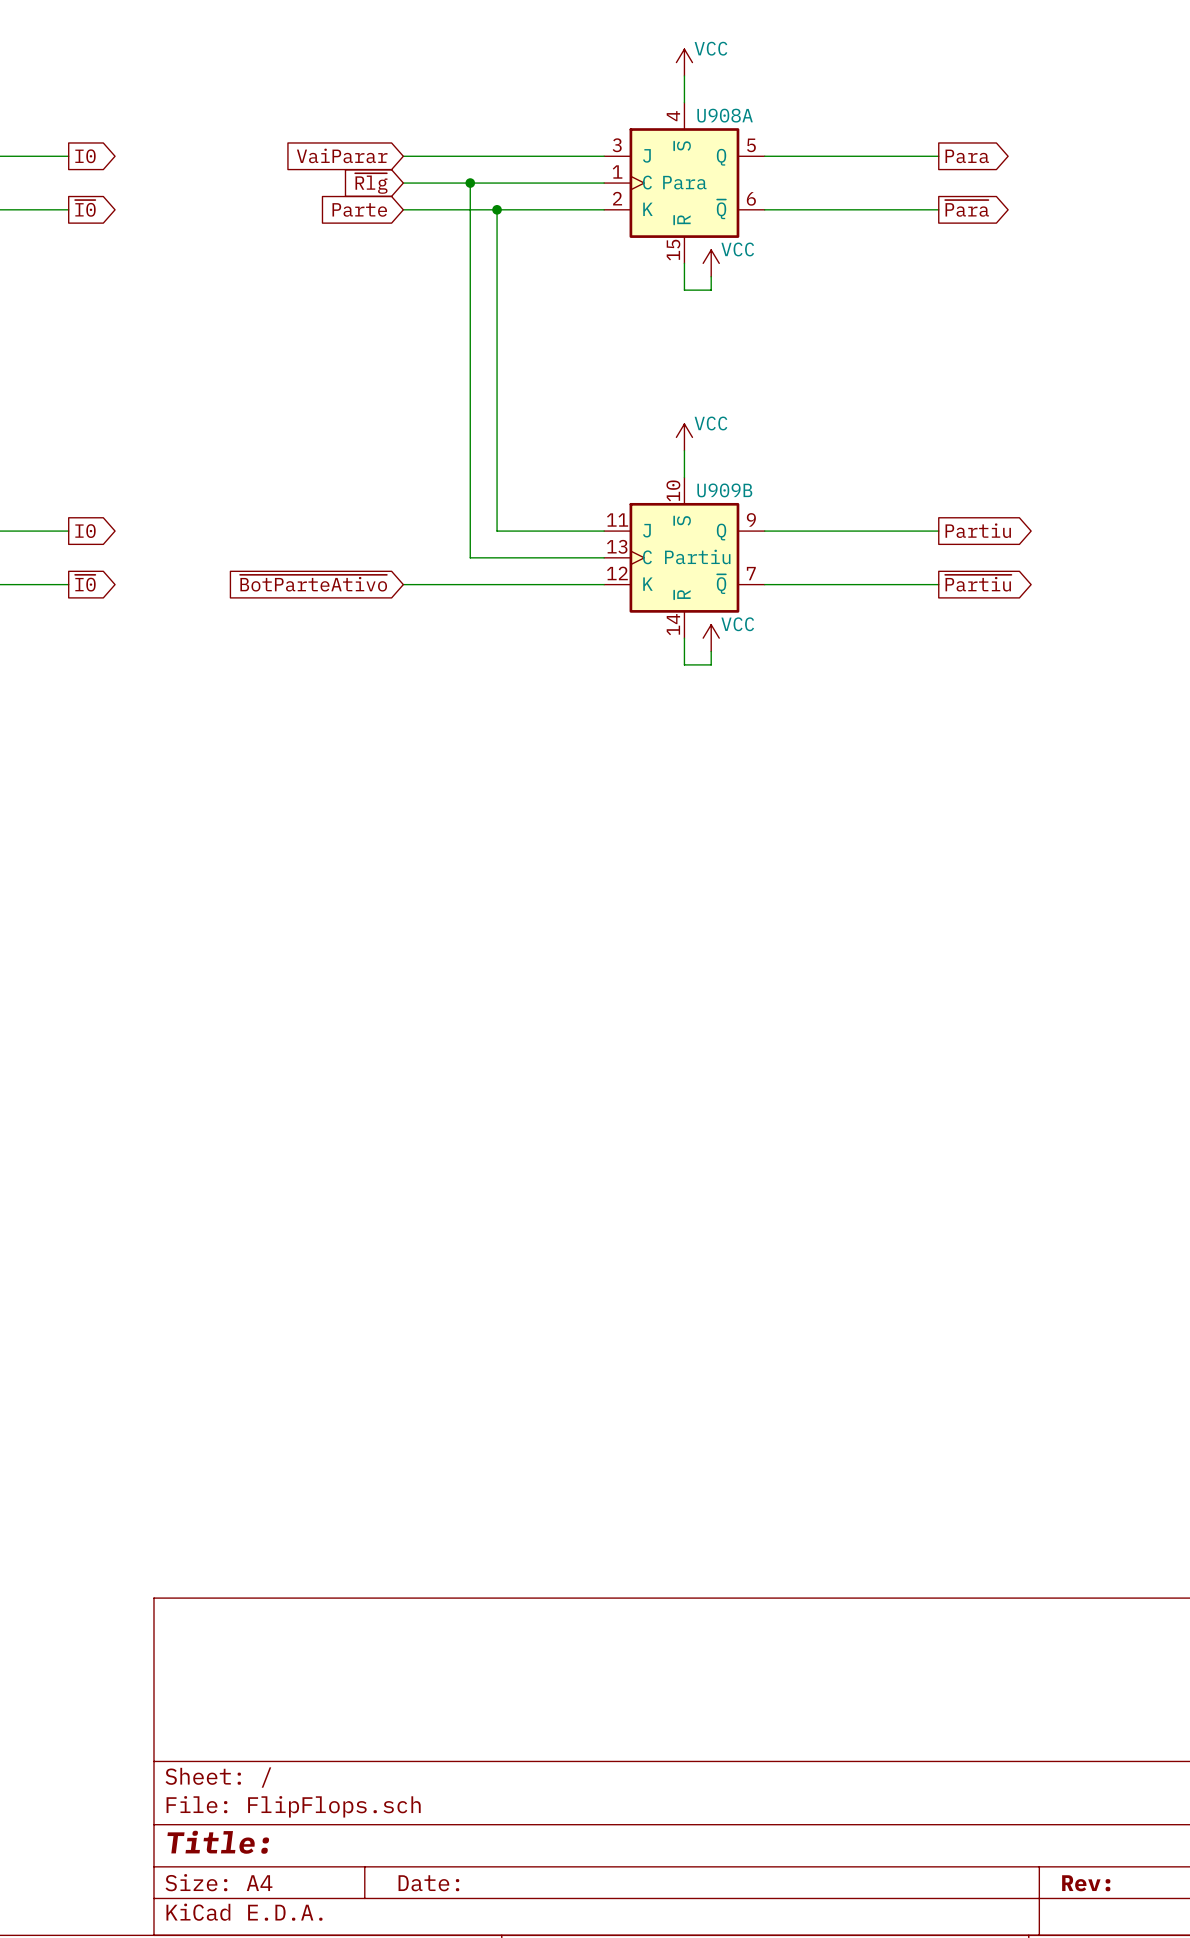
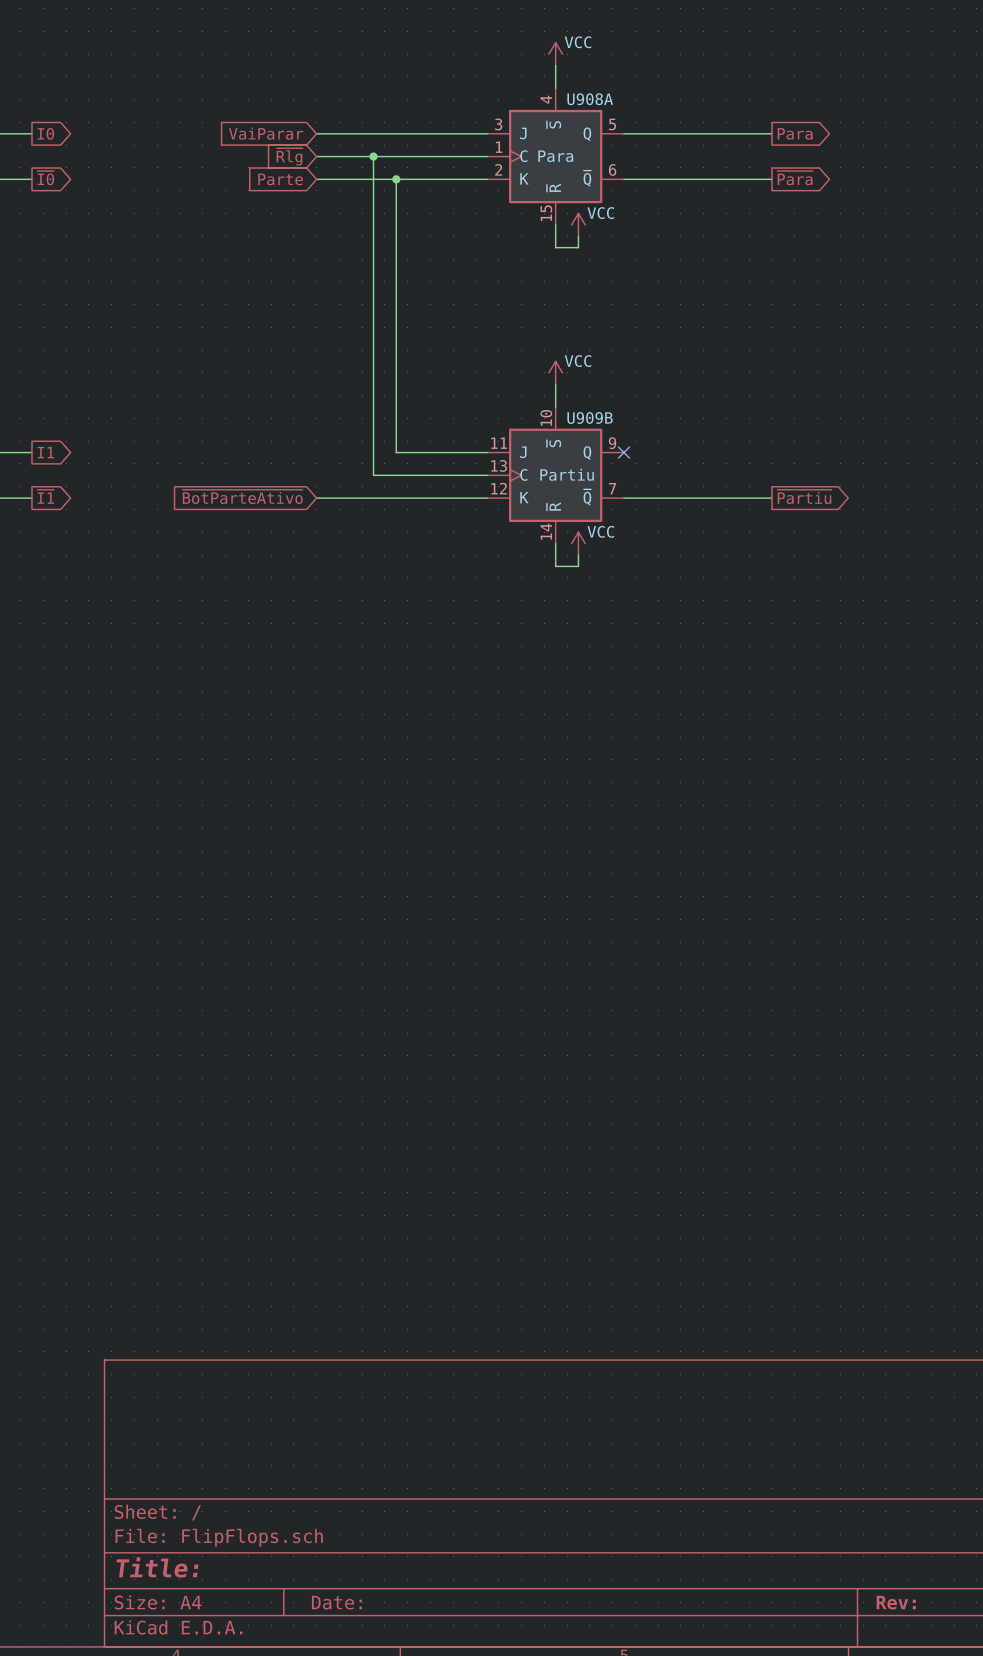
global label: Partiu (978, 530) -> none
global label: I0 (85, 531) -> I1 (45, 452)
wire: (764, 531) (938, 531) -> none
no-connect mark: none -> (623, 452)
global label: ~{I0} (85, 583) -> ~{I1} (45, 496)

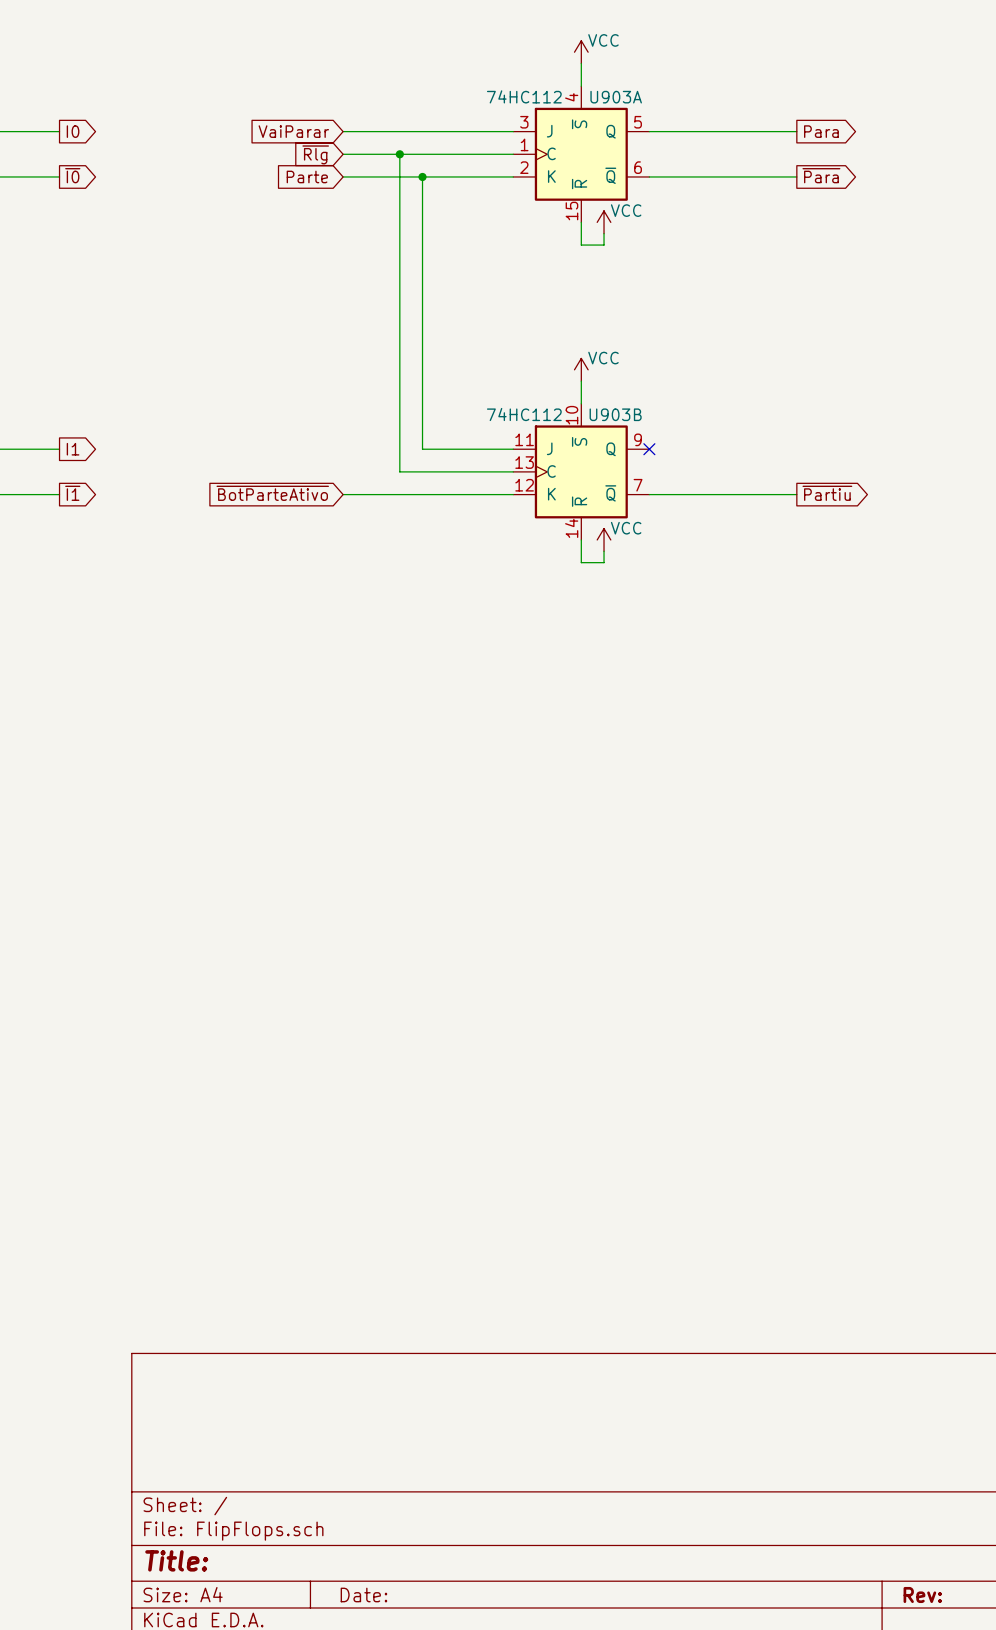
U908A name: U908A (590, 99) -> U903A (616, 97)
U908A value: Para (555, 156) -> 74HC112 (524, 96)
U909B name: U909B (590, 417) -> U903B (615, 414)
U909B value: Partiu (567, 474) -> 74HC112 (524, 414)

